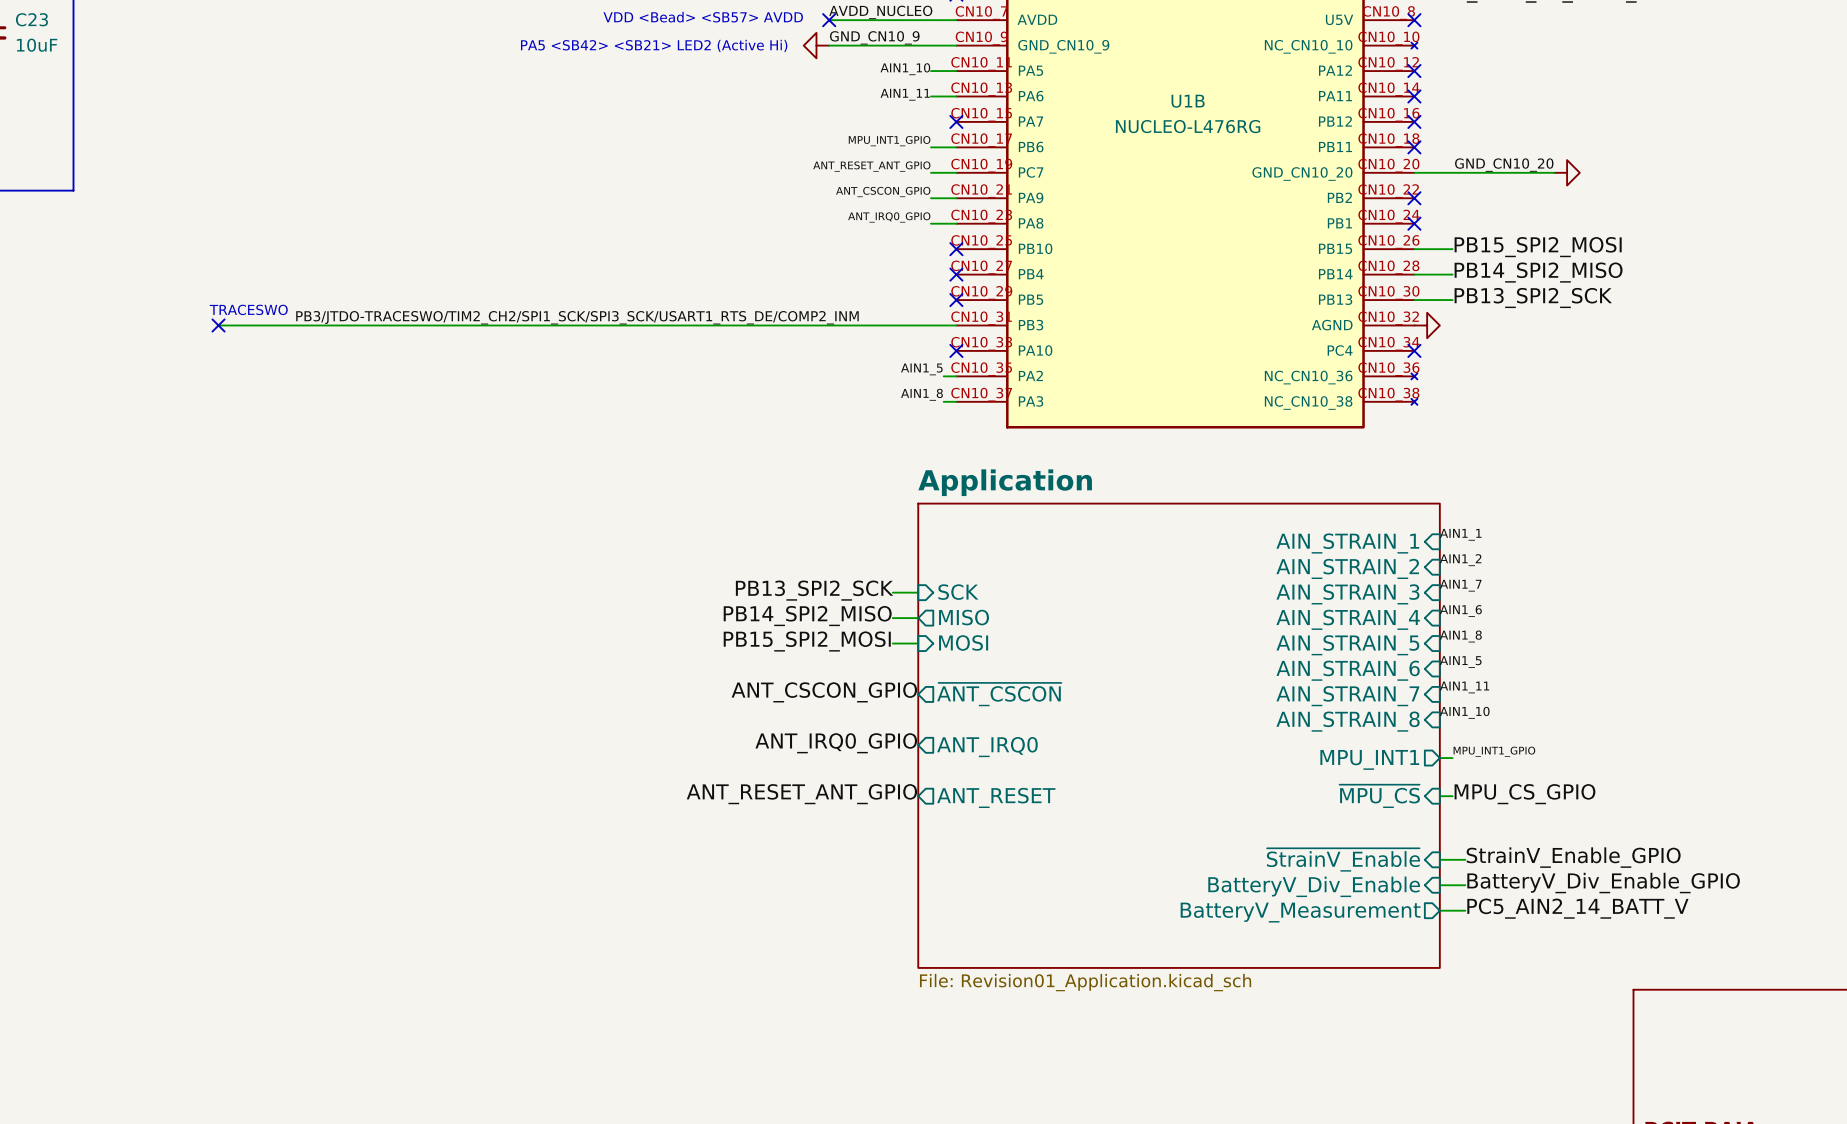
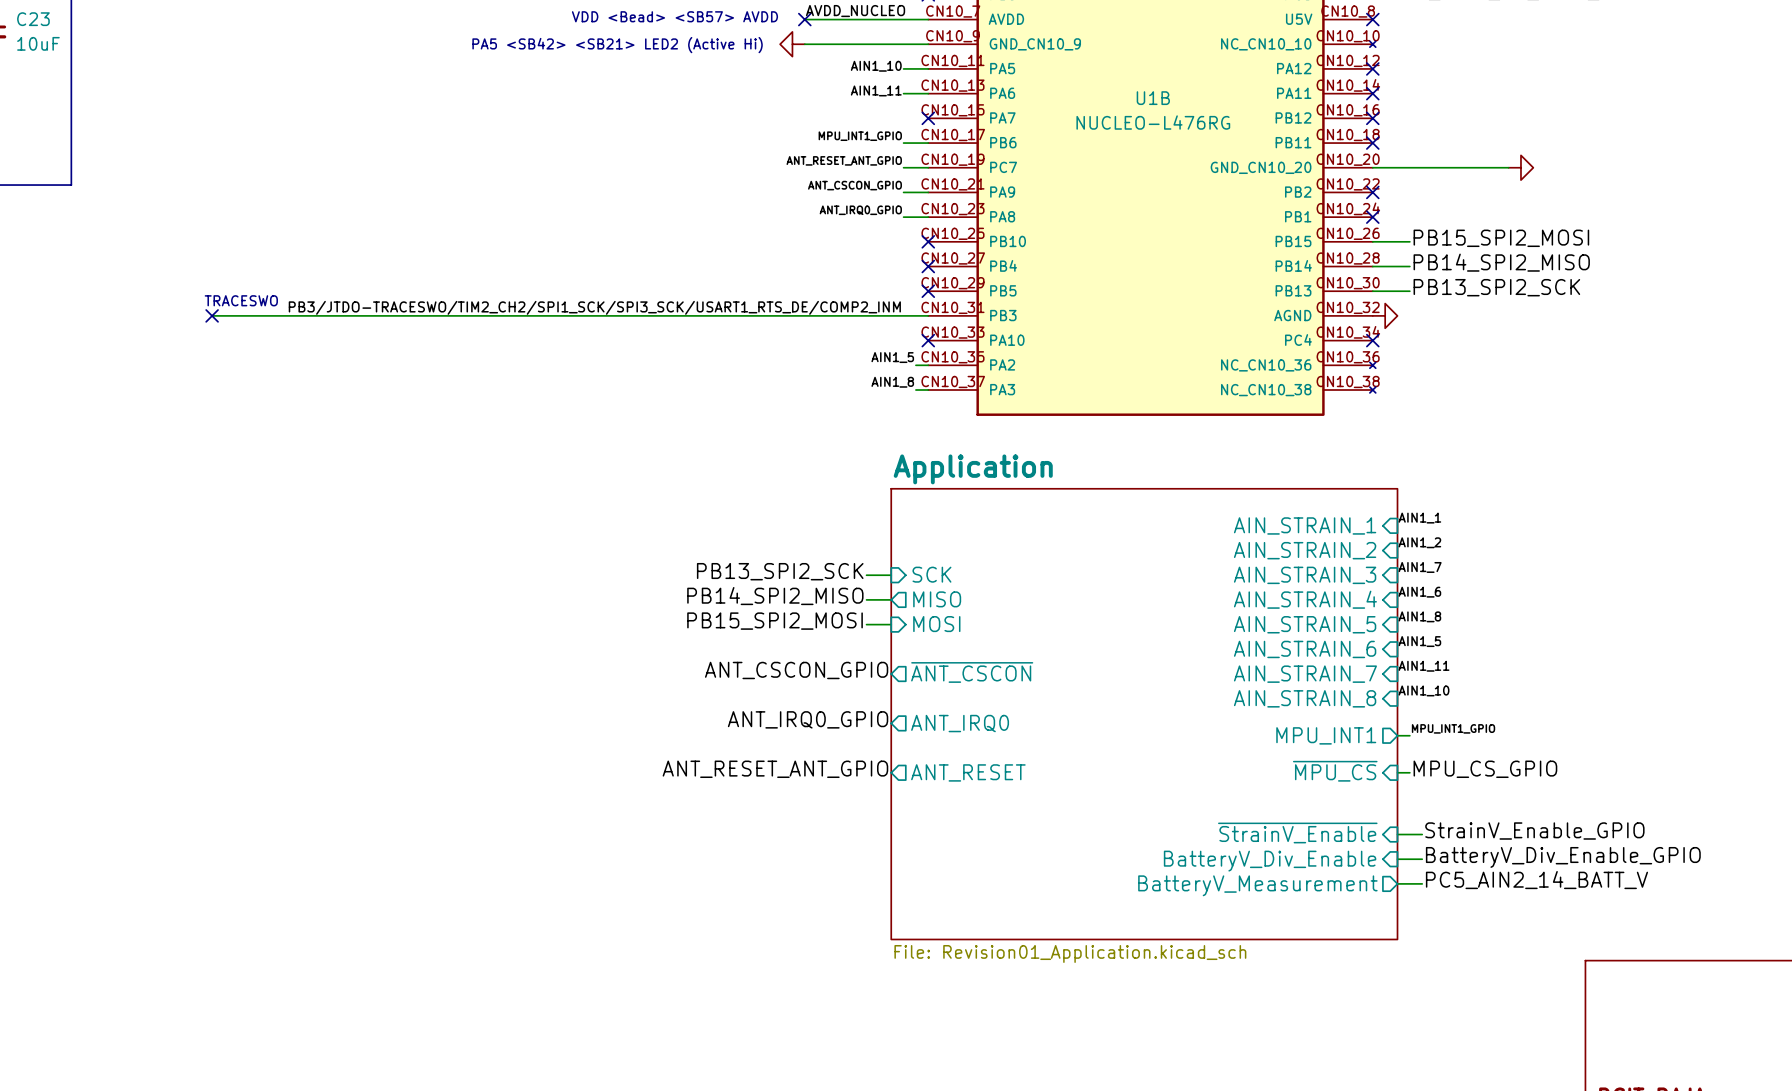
label: GND_CN10_9 (874, 37) -> none
label: GND_CN10_20 (1504, 165) -> none

